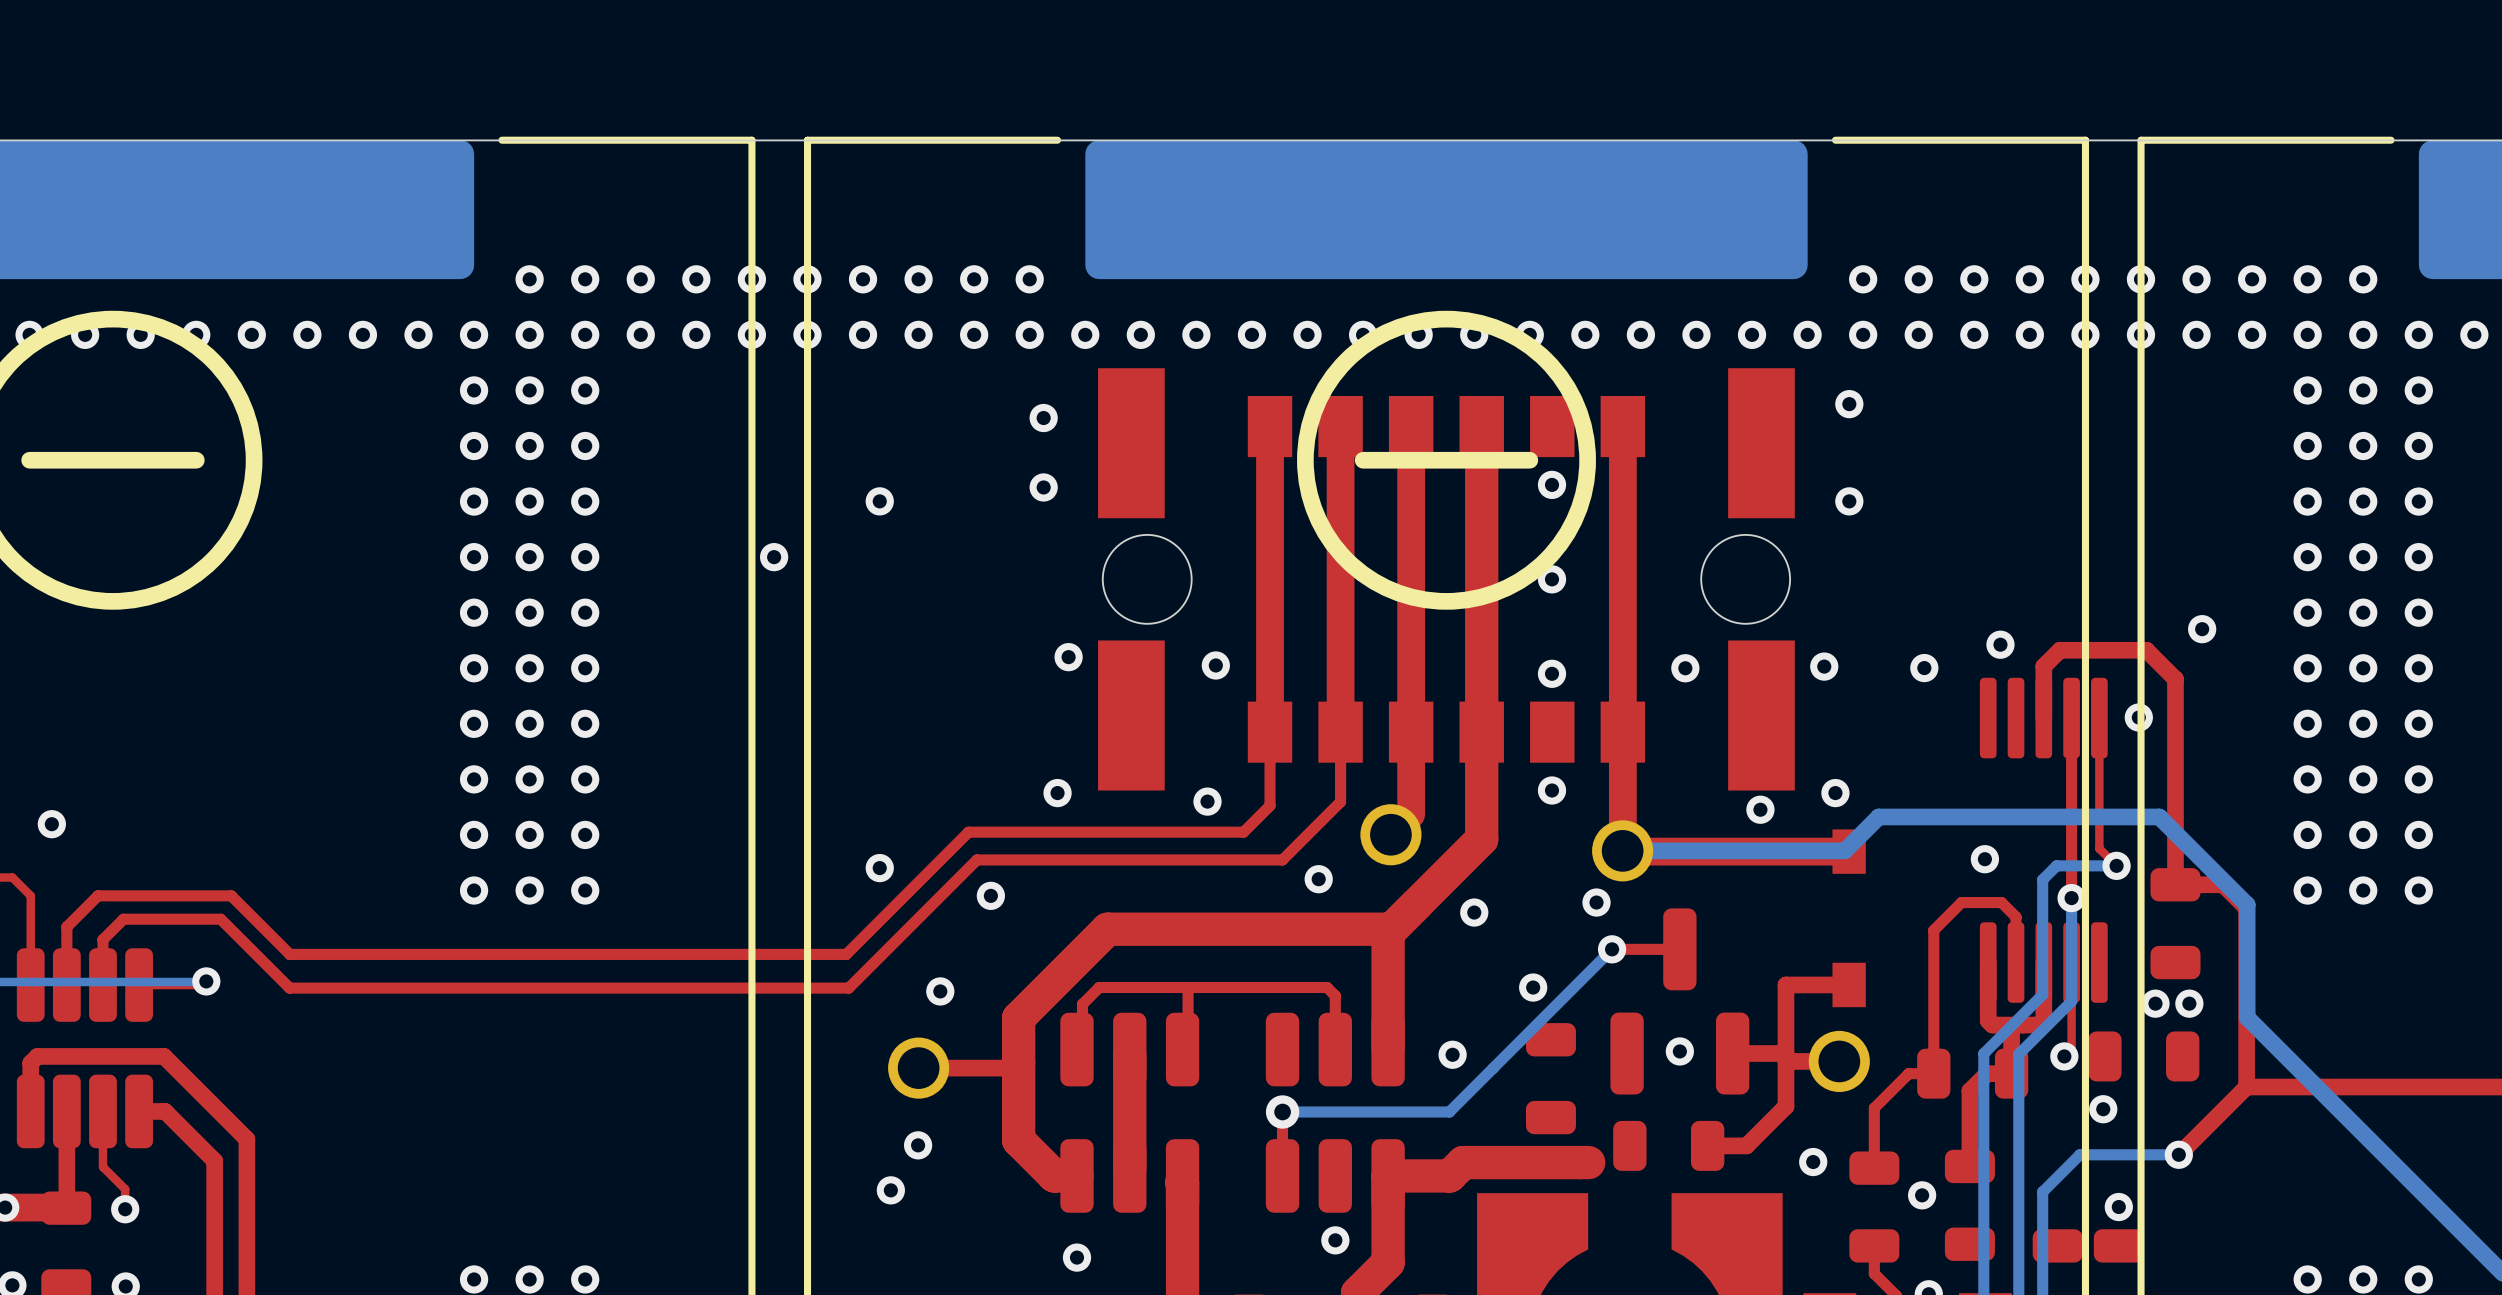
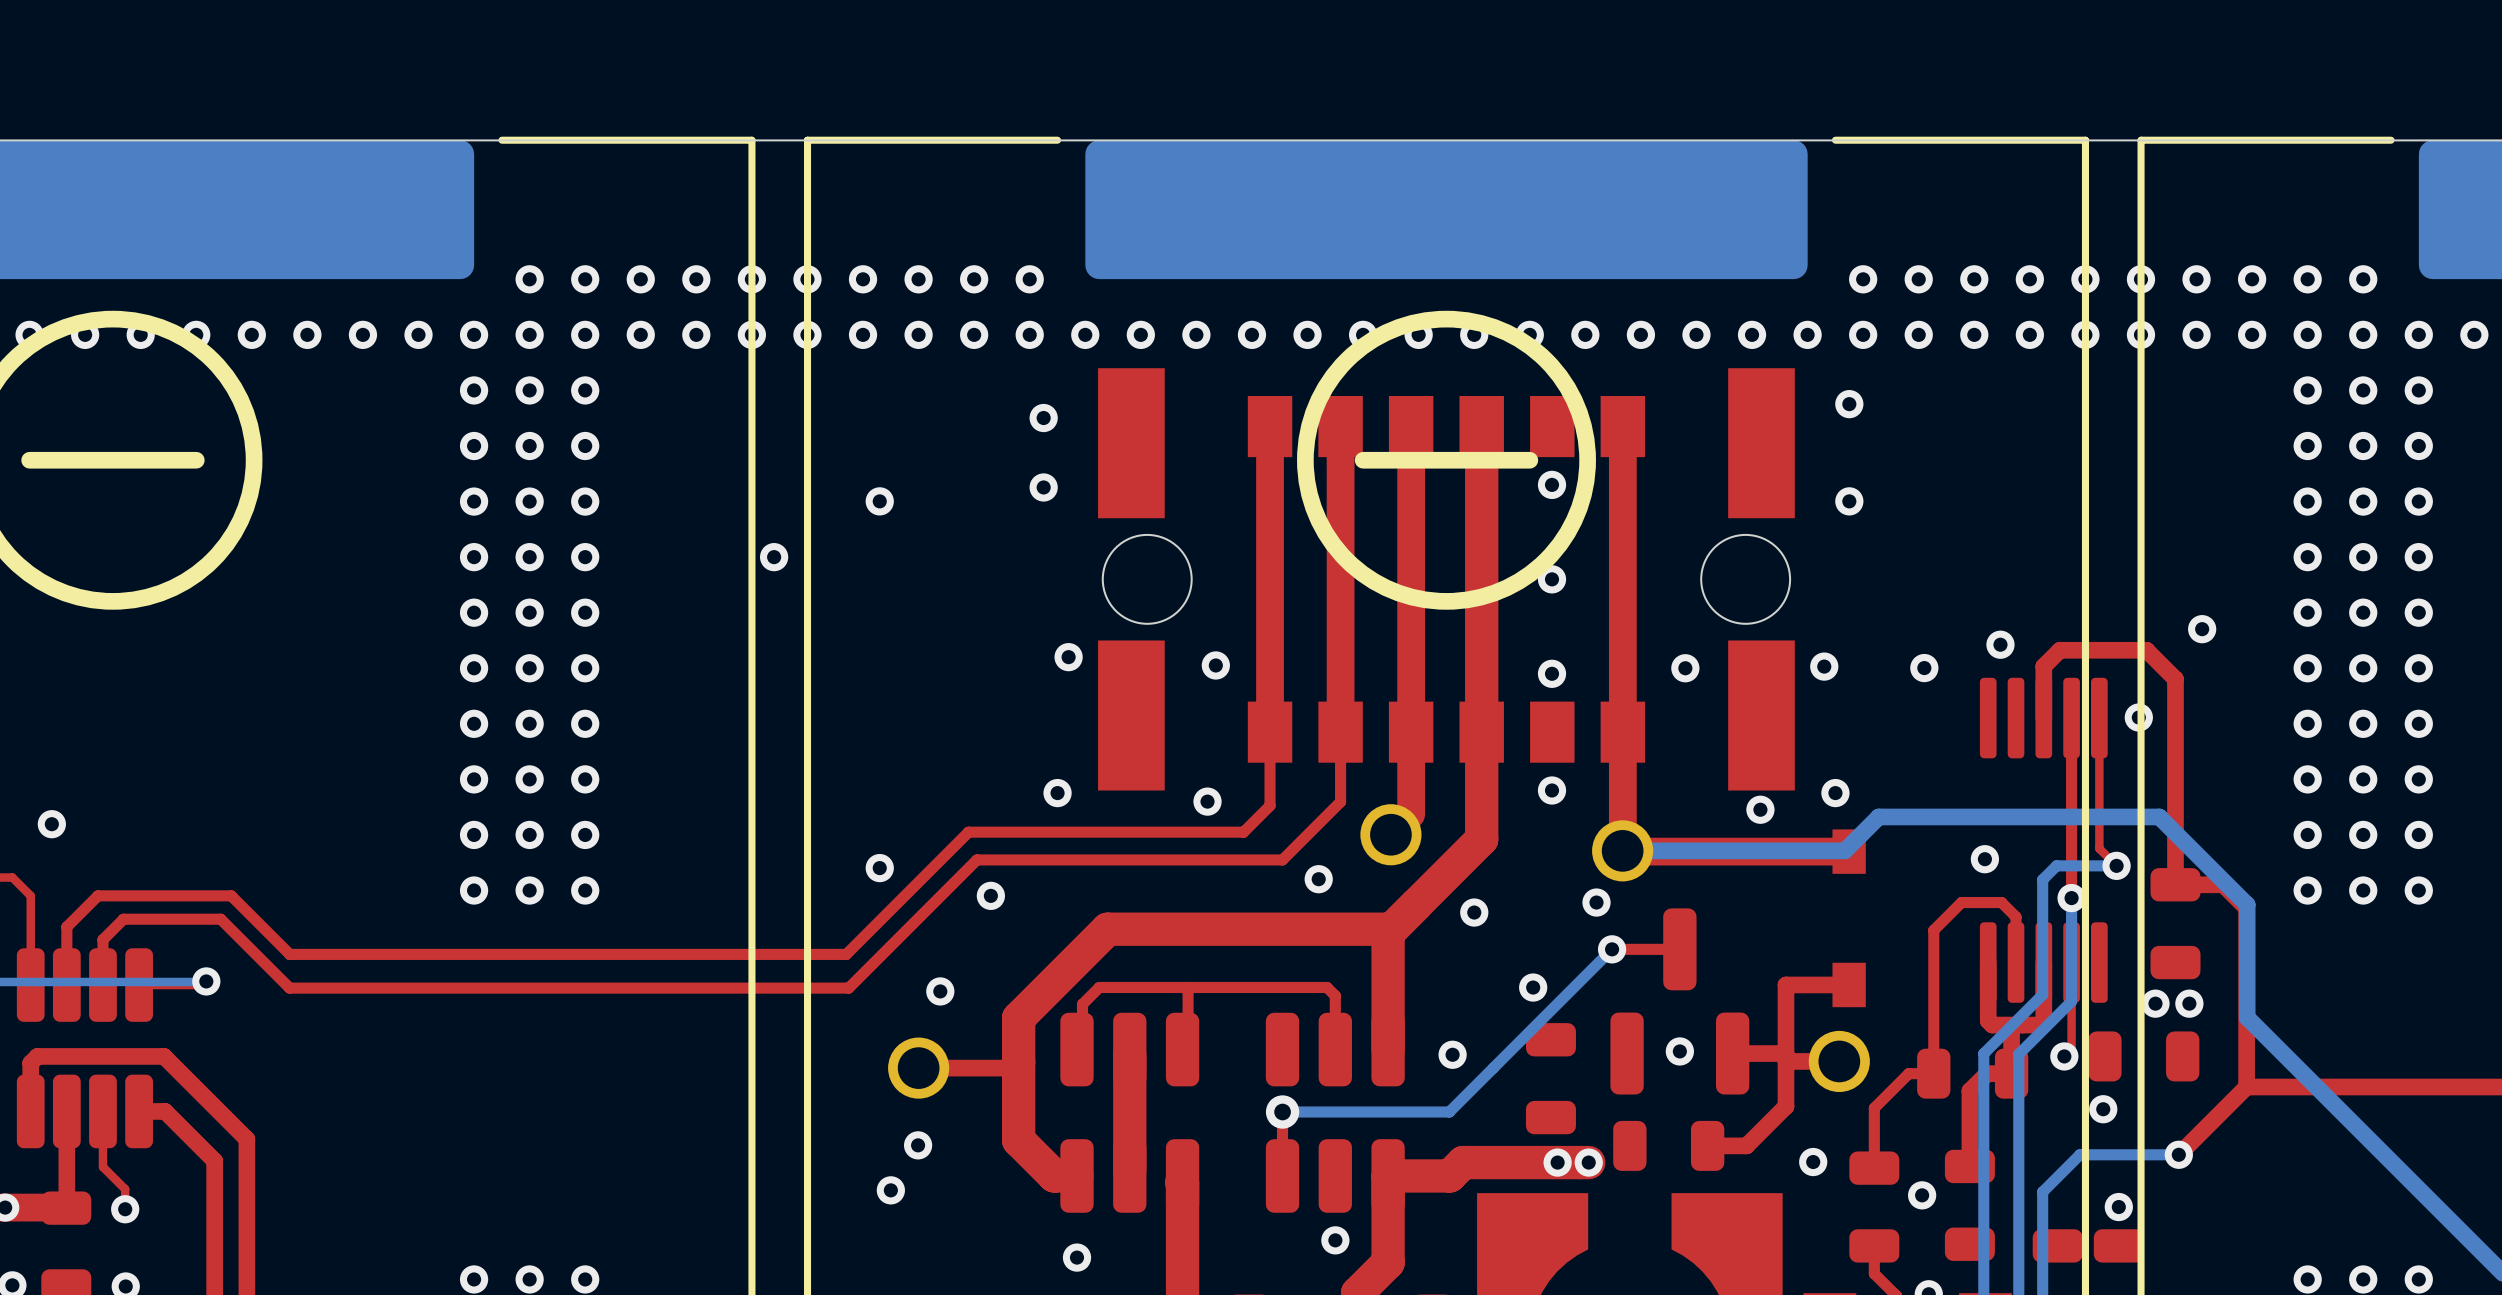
via: none -> (1557, 1162)
via: none -> (1588, 1162)

